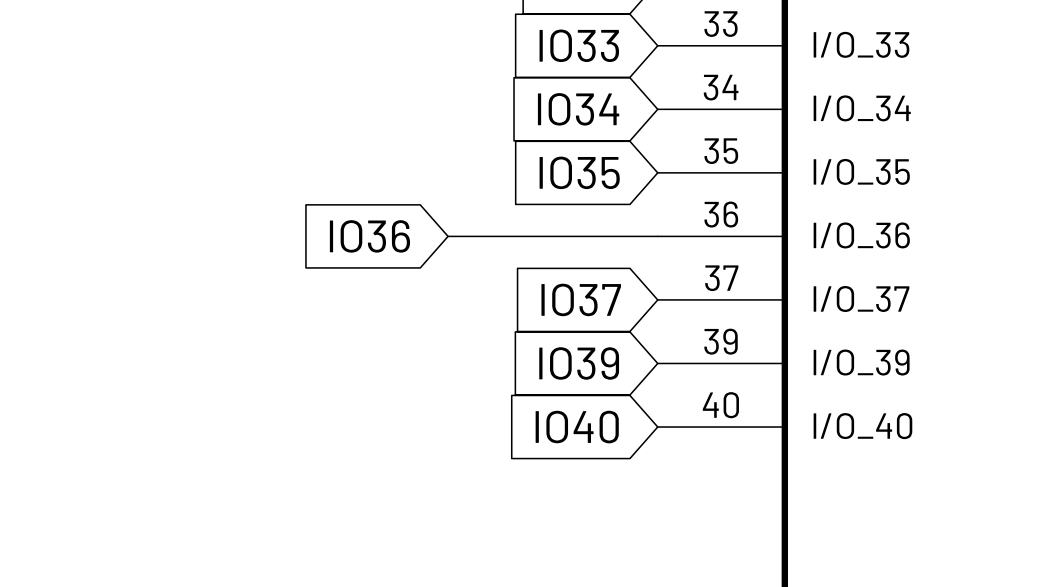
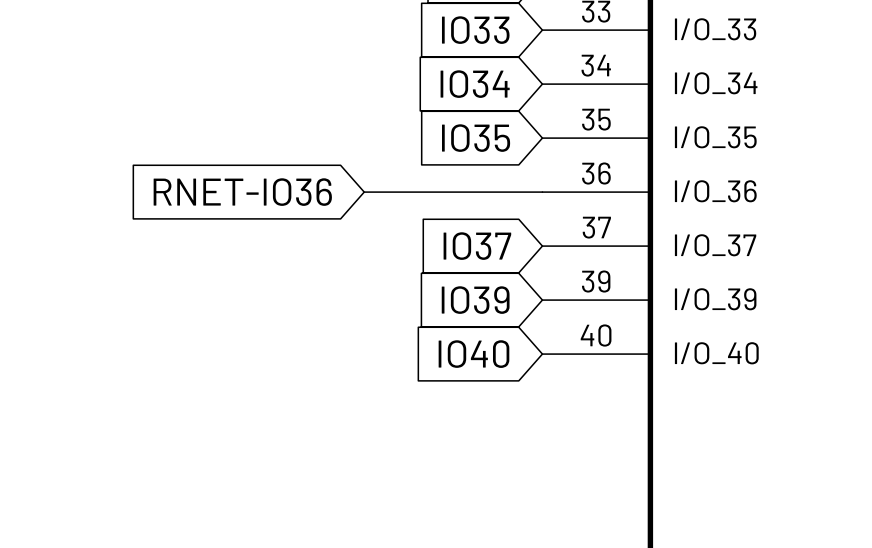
global label: IO36 (369, 236) -> RNET-IO36 (242, 192)

